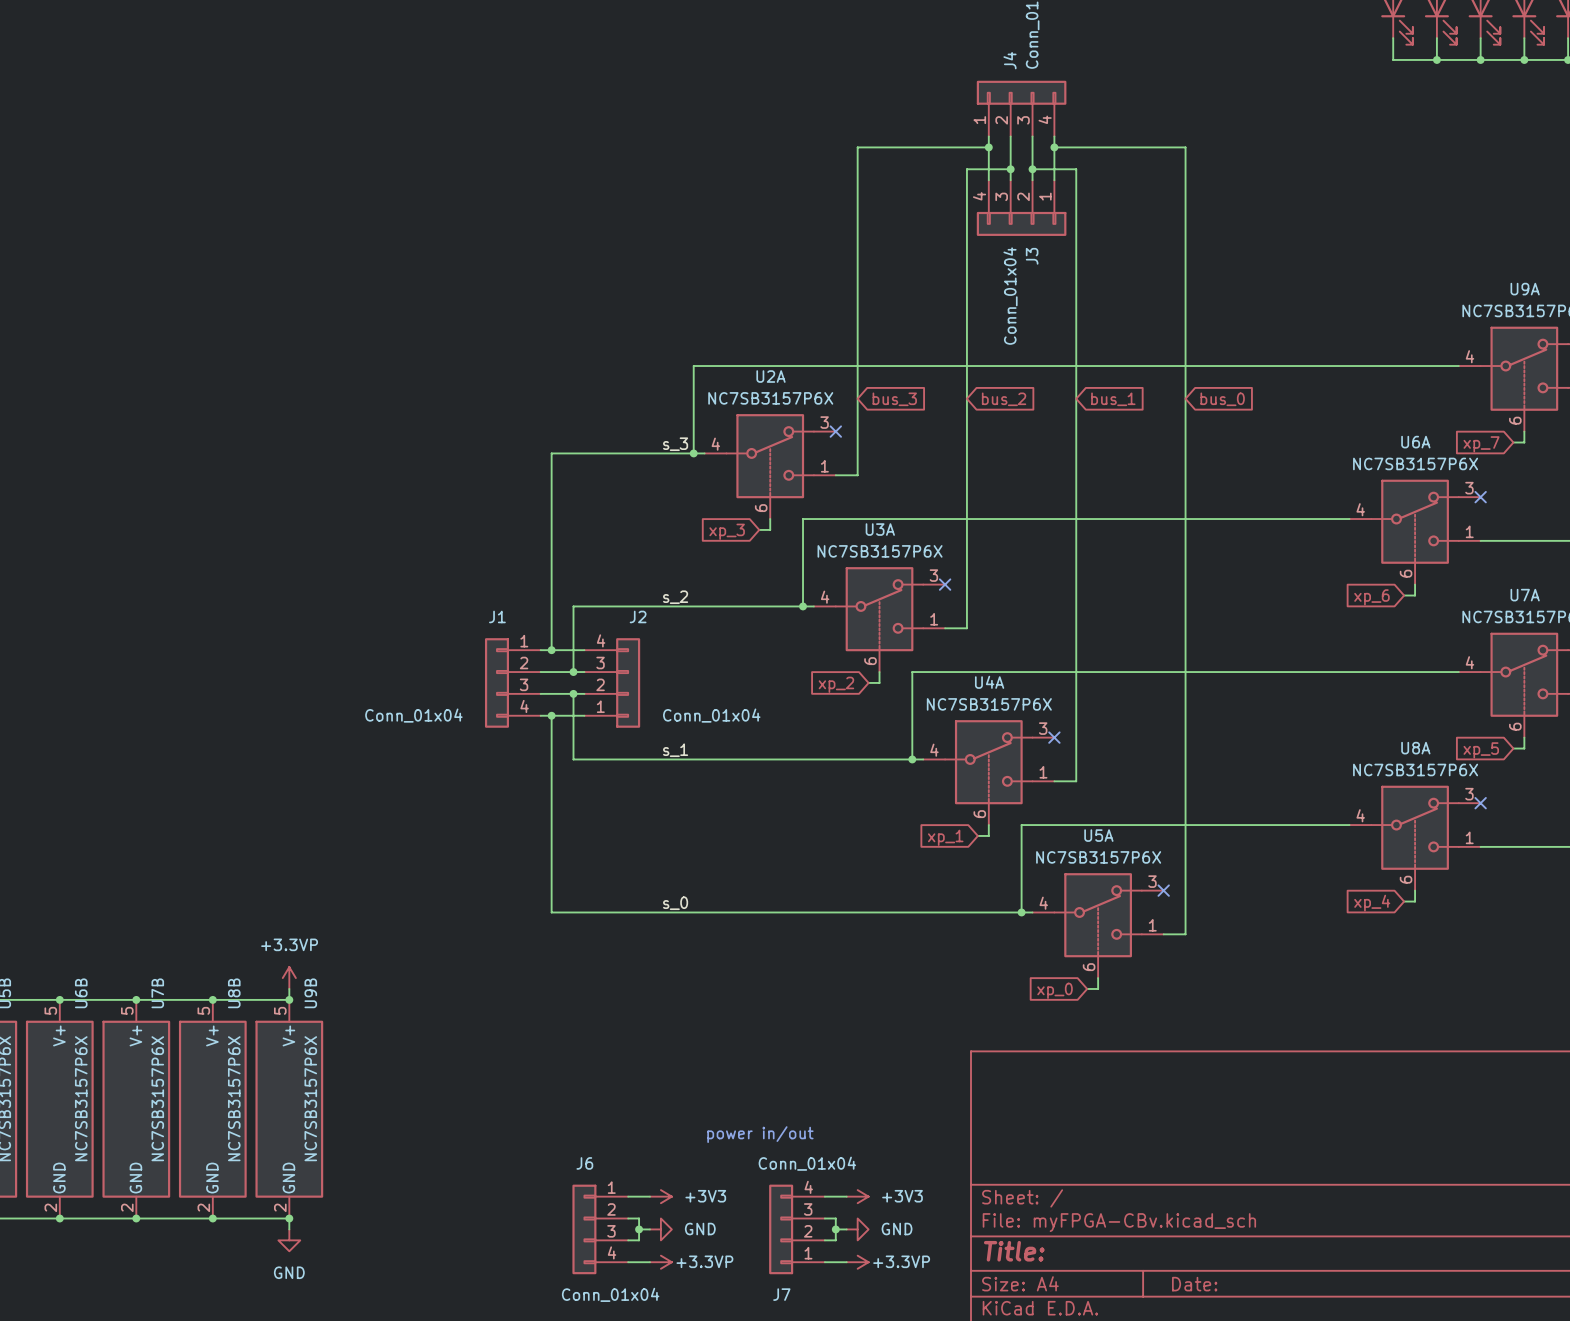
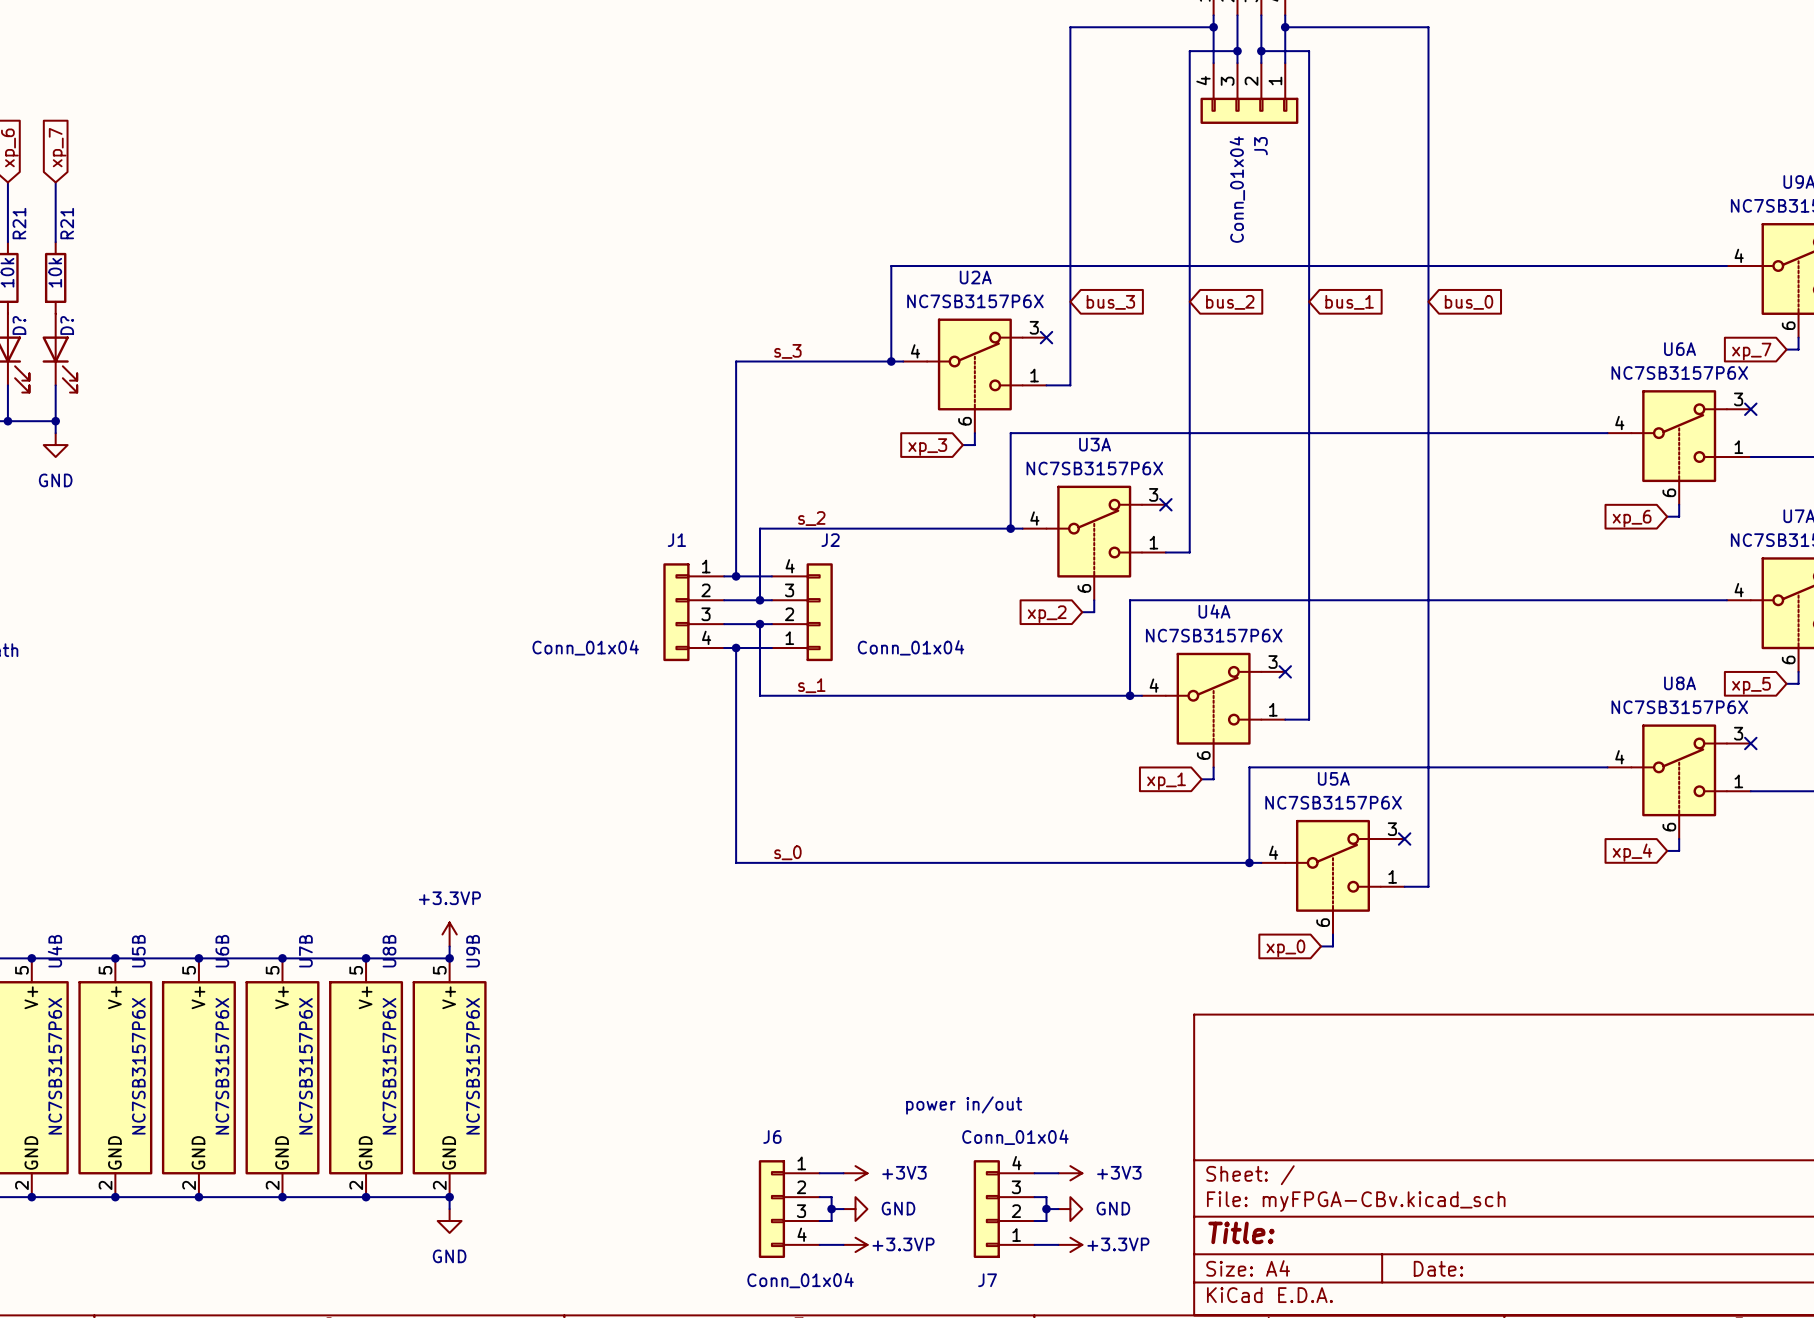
label position: s_3 (675, 444) -> s_3 (787, 351)
label position: s_2 (675, 597) -> s_2 (811, 518)
label position: s_1 (675, 750) -> s_1 (811, 685)
label position: s_0 (675, 903) -> s_0 (787, 852)

